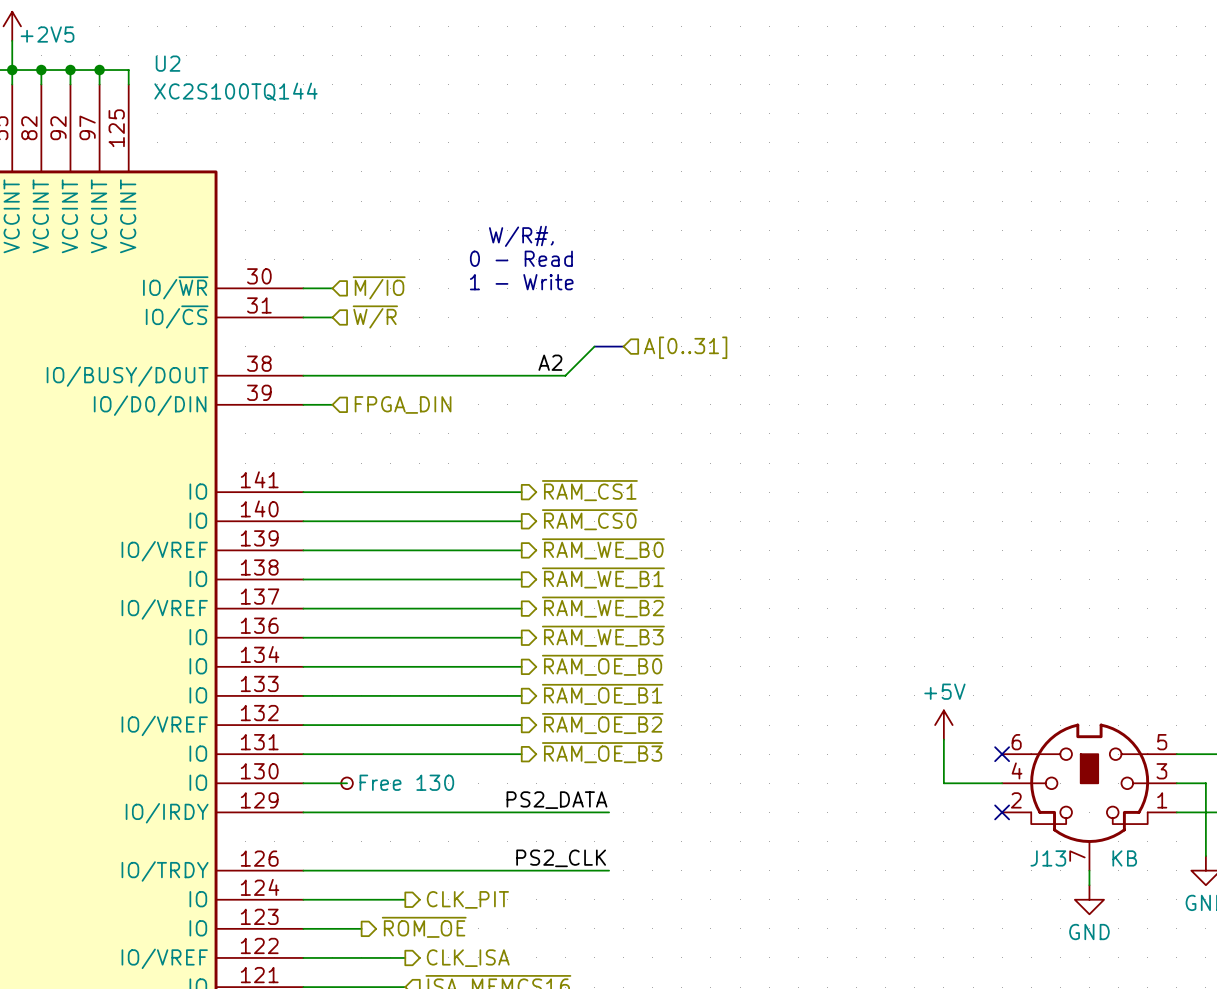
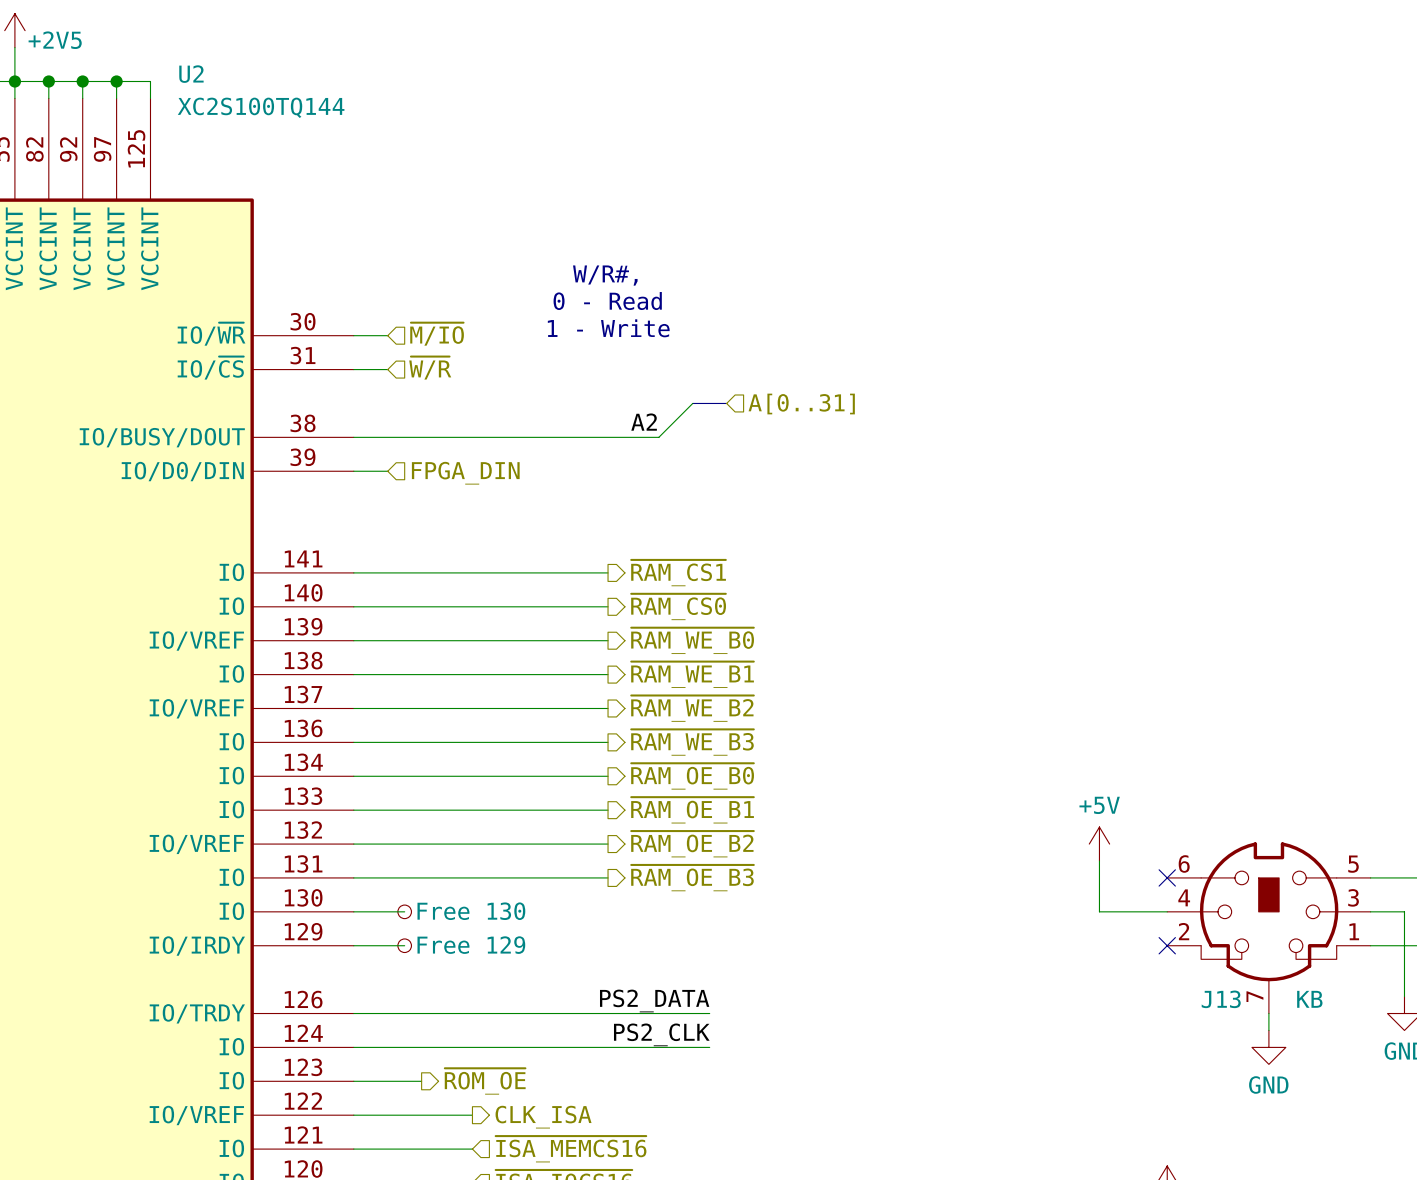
label: PS2_DATA (556, 800) -> none
wire: (347, 812) (609, 812) -> none
part: none -> Free 129 (404, 945)
label: PS2_CLK (561, 858) -> PS2_DATA (654, 1000)
label: none -> PS2_CLK (661, 1034)
wire: none -> (472, 1047) (709, 1047)
hierarchical label: CLK_PIT (467, 899) -> none

